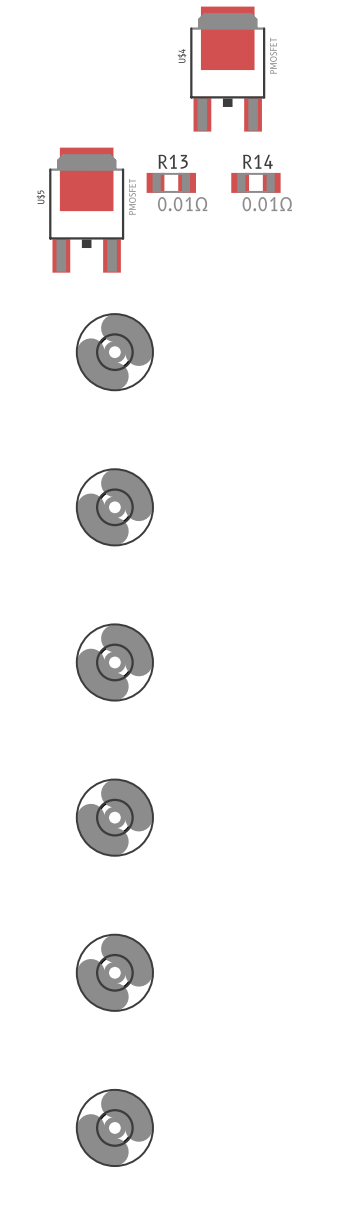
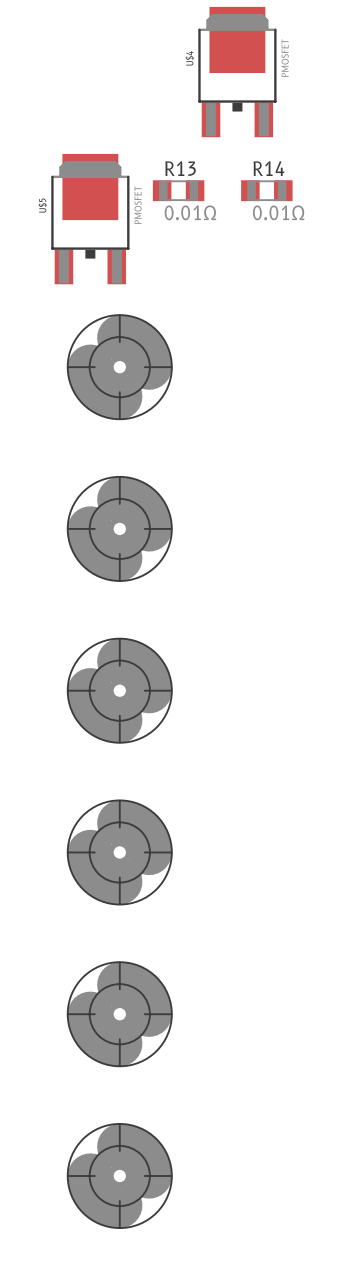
part footprint: [75, 313, 154, 392] -> [66, 314, 173, 421]
part footprint: [75, 468, 154, 547] -> [66, 475, 173, 582]
part footprint: [75, 623, 154, 702] -> [66, 637, 173, 744]
part footprint: [75, 778, 154, 857] -> [66, 799, 173, 906]
part footprint: [75, 933, 154, 1012] -> [66, 961, 173, 1068]
part footprint: [75, 1089, 154, 1167] -> [66, 1123, 173, 1229]

